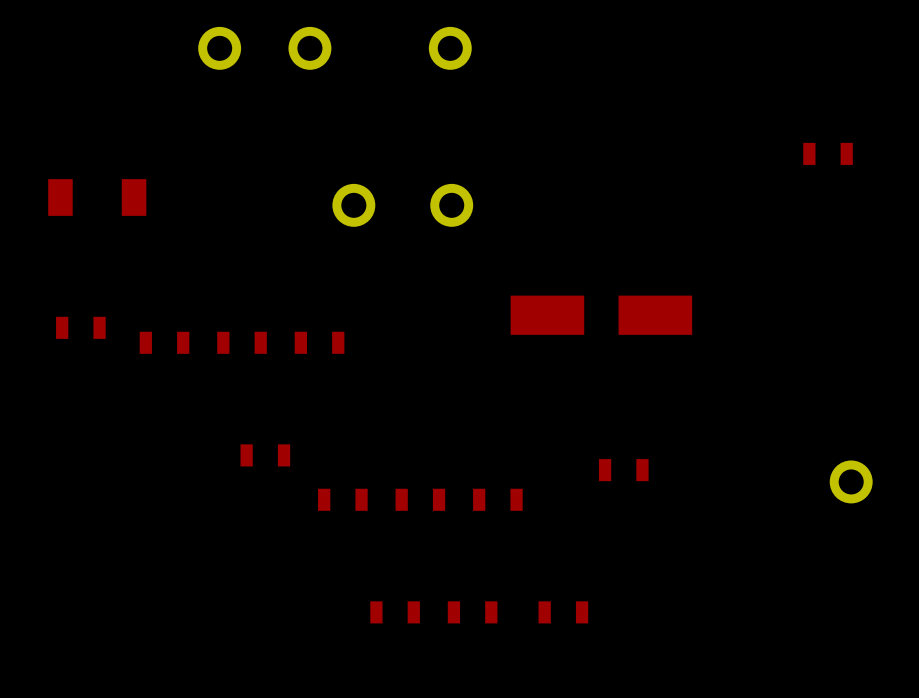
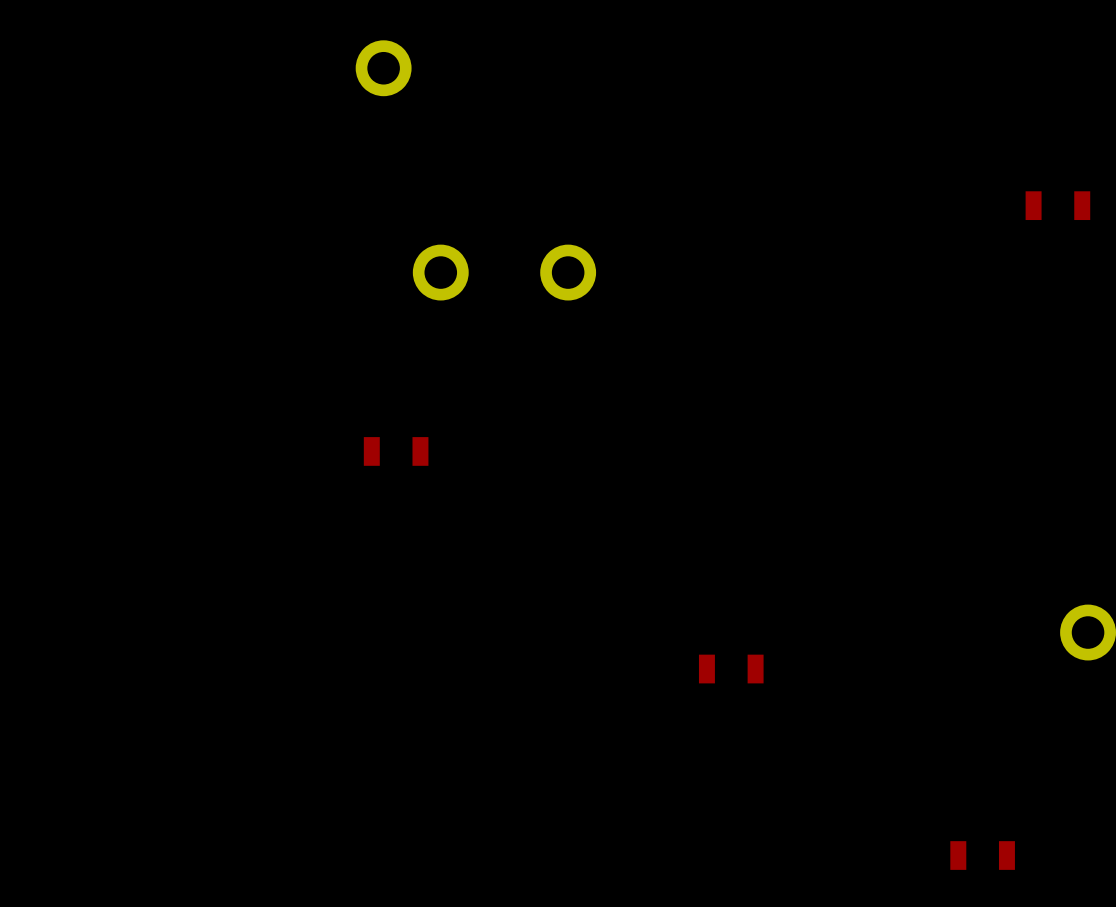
part: (219, 48) -> none
part: (450, 48) -> none
part: (97, 197) -> none
part: (601, 315) -> none
part: (80, 327) -> none
part: (164, 342) -> none
part: (242, 342) -> none
part: (265, 455) -> none
part: (623, 470) -> none
part: (342, 499) -> none
part: (420, 499) -> none
part: (497, 499) -> none
part: none -> (731, 669)
part: (395, 612) -> none
part: (472, 612) -> none
part: (563, 612) -> none
part: none -> (982, 855)

